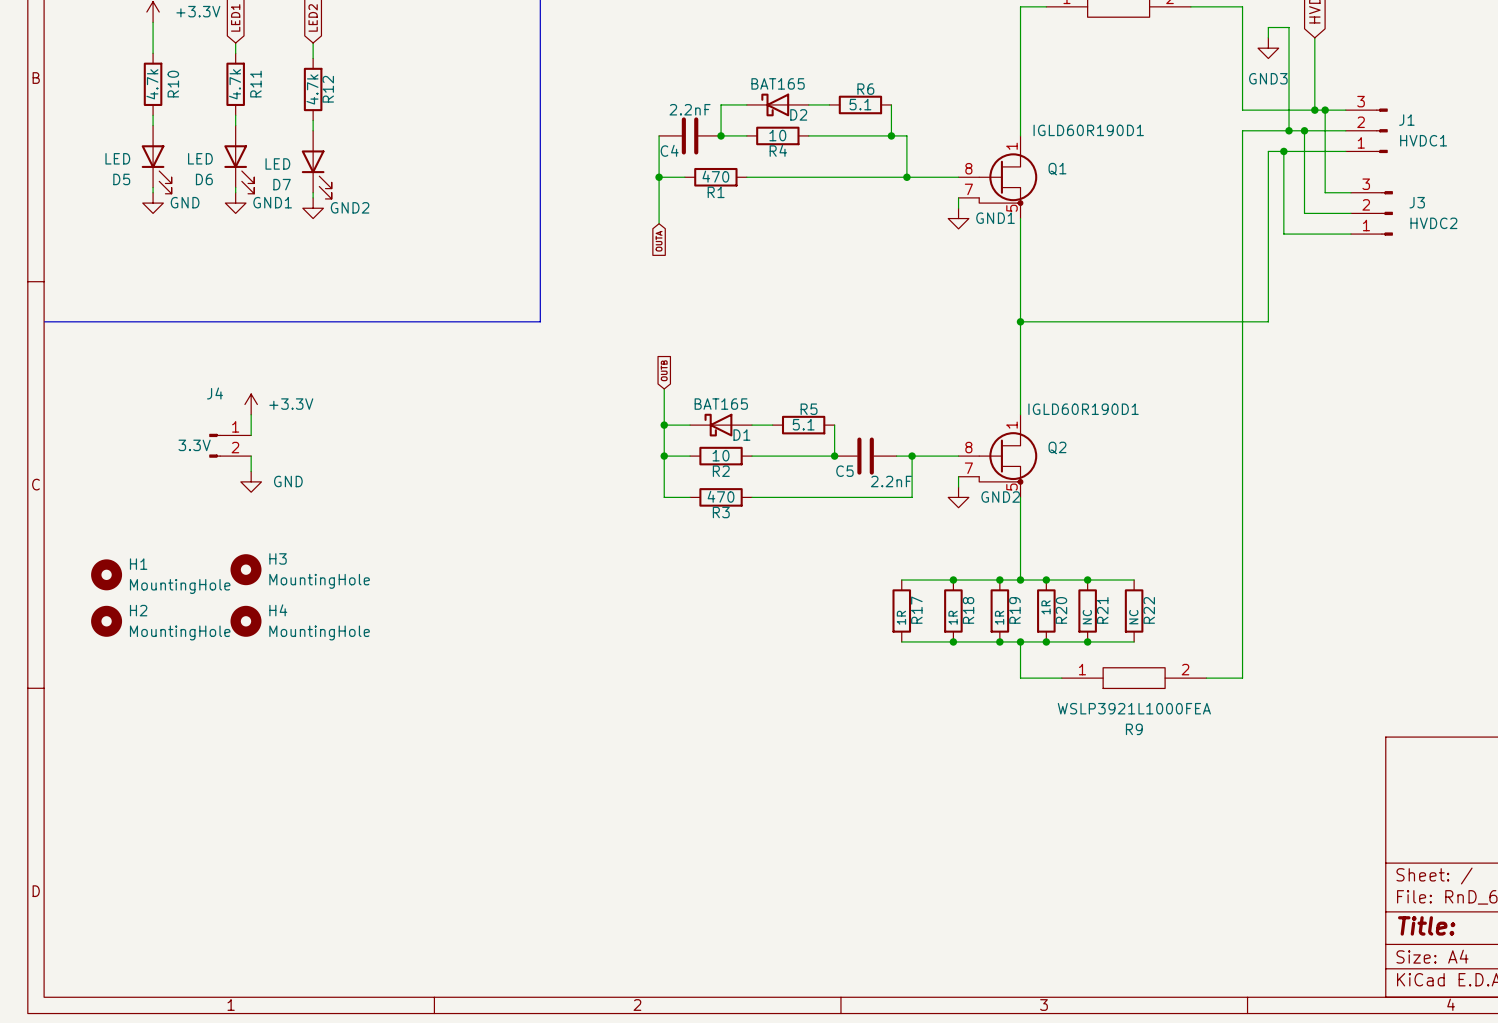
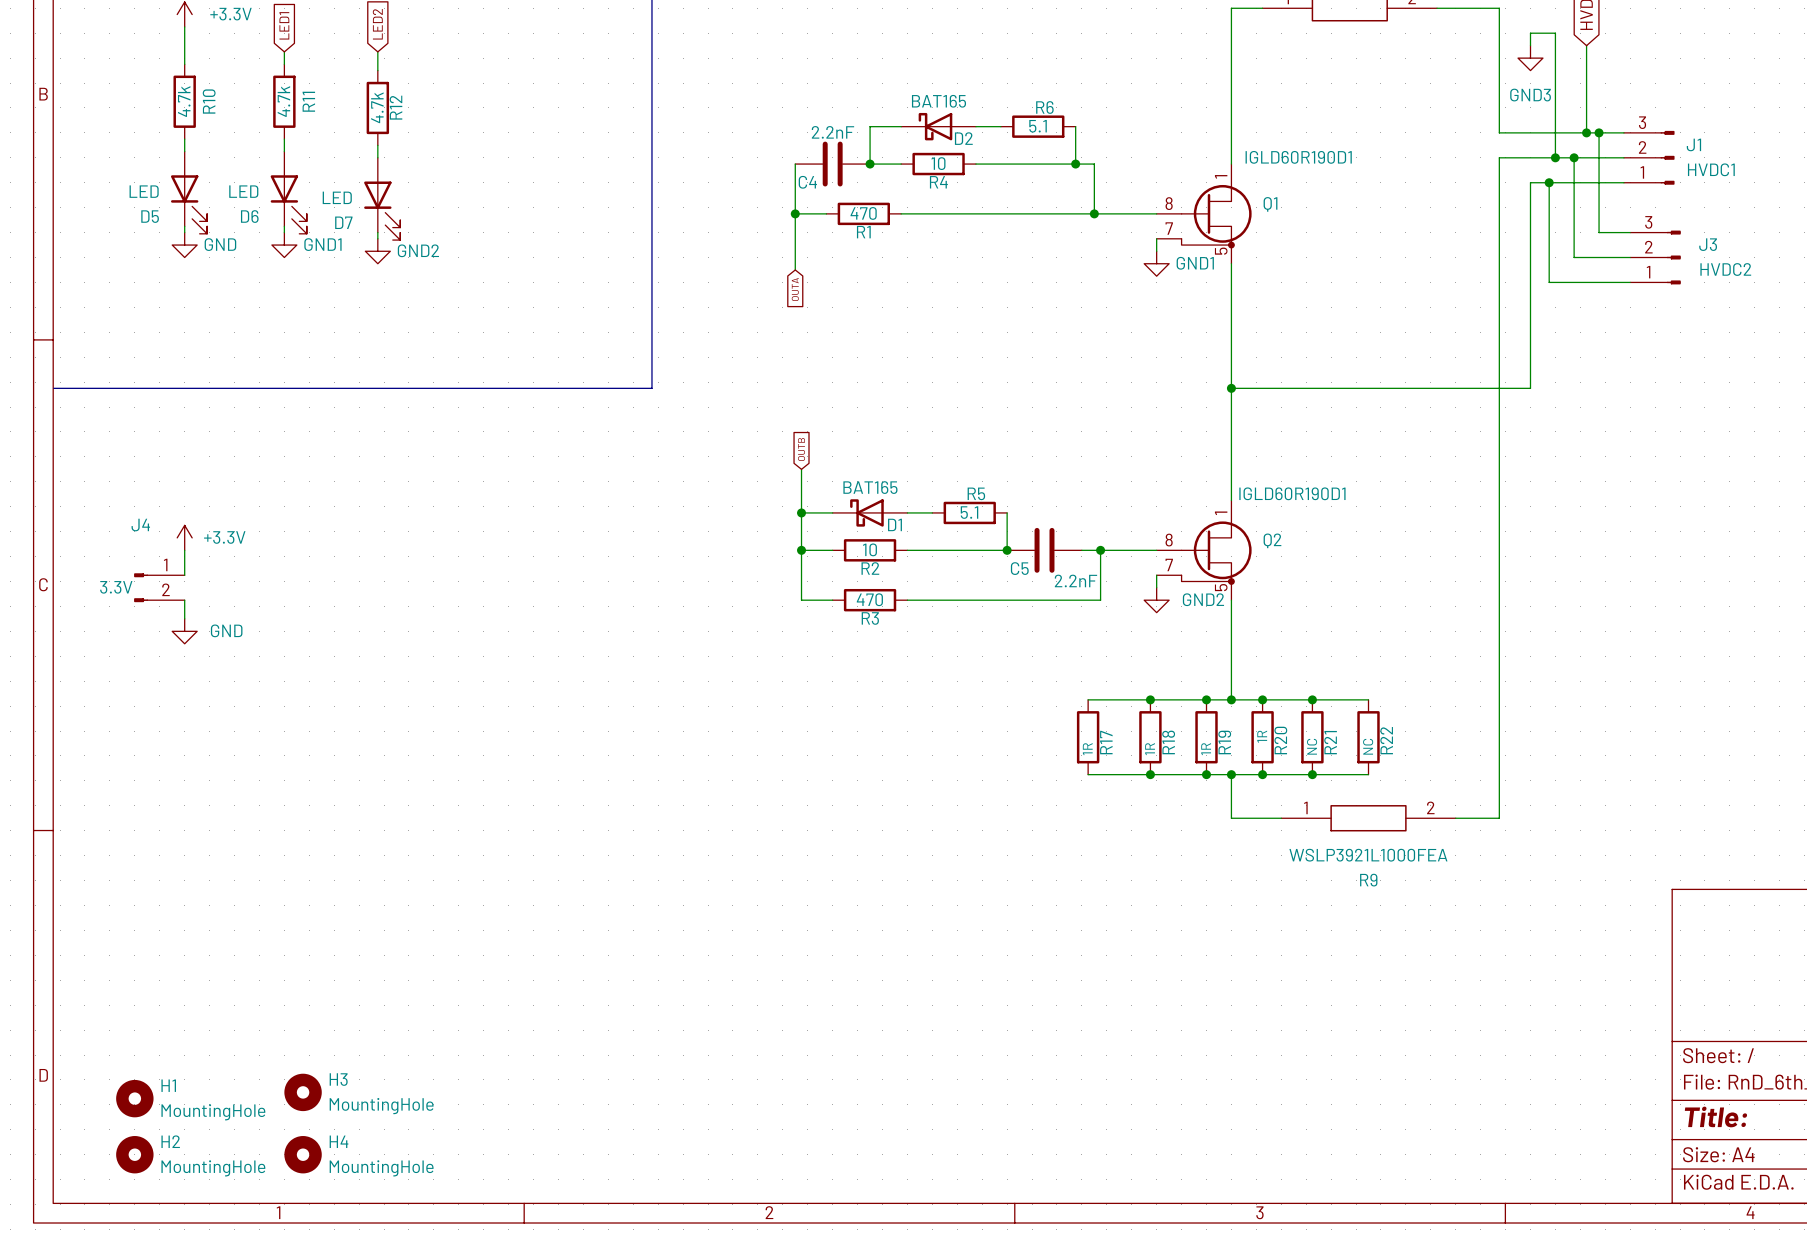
power symbol position: +3.3V (251, 404) -> +3.3V (184, 537)
wire: (251, 414) (251, 435) -> (184, 550) (184, 575)
J4 position: (230, 445) -> (159, 587)
wire: (251, 456) (251, 471) -> (184, 600) (184, 618)
power symbol position: GND (251, 481) -> GND (184, 631)
H3 position: (245, 569) -> (303, 1092)
H1 position: (106, 574) -> (134, 1098)
H2 position: (106, 621) -> (134, 1154)
H4 position: (245, 621) -> (303, 1154)

